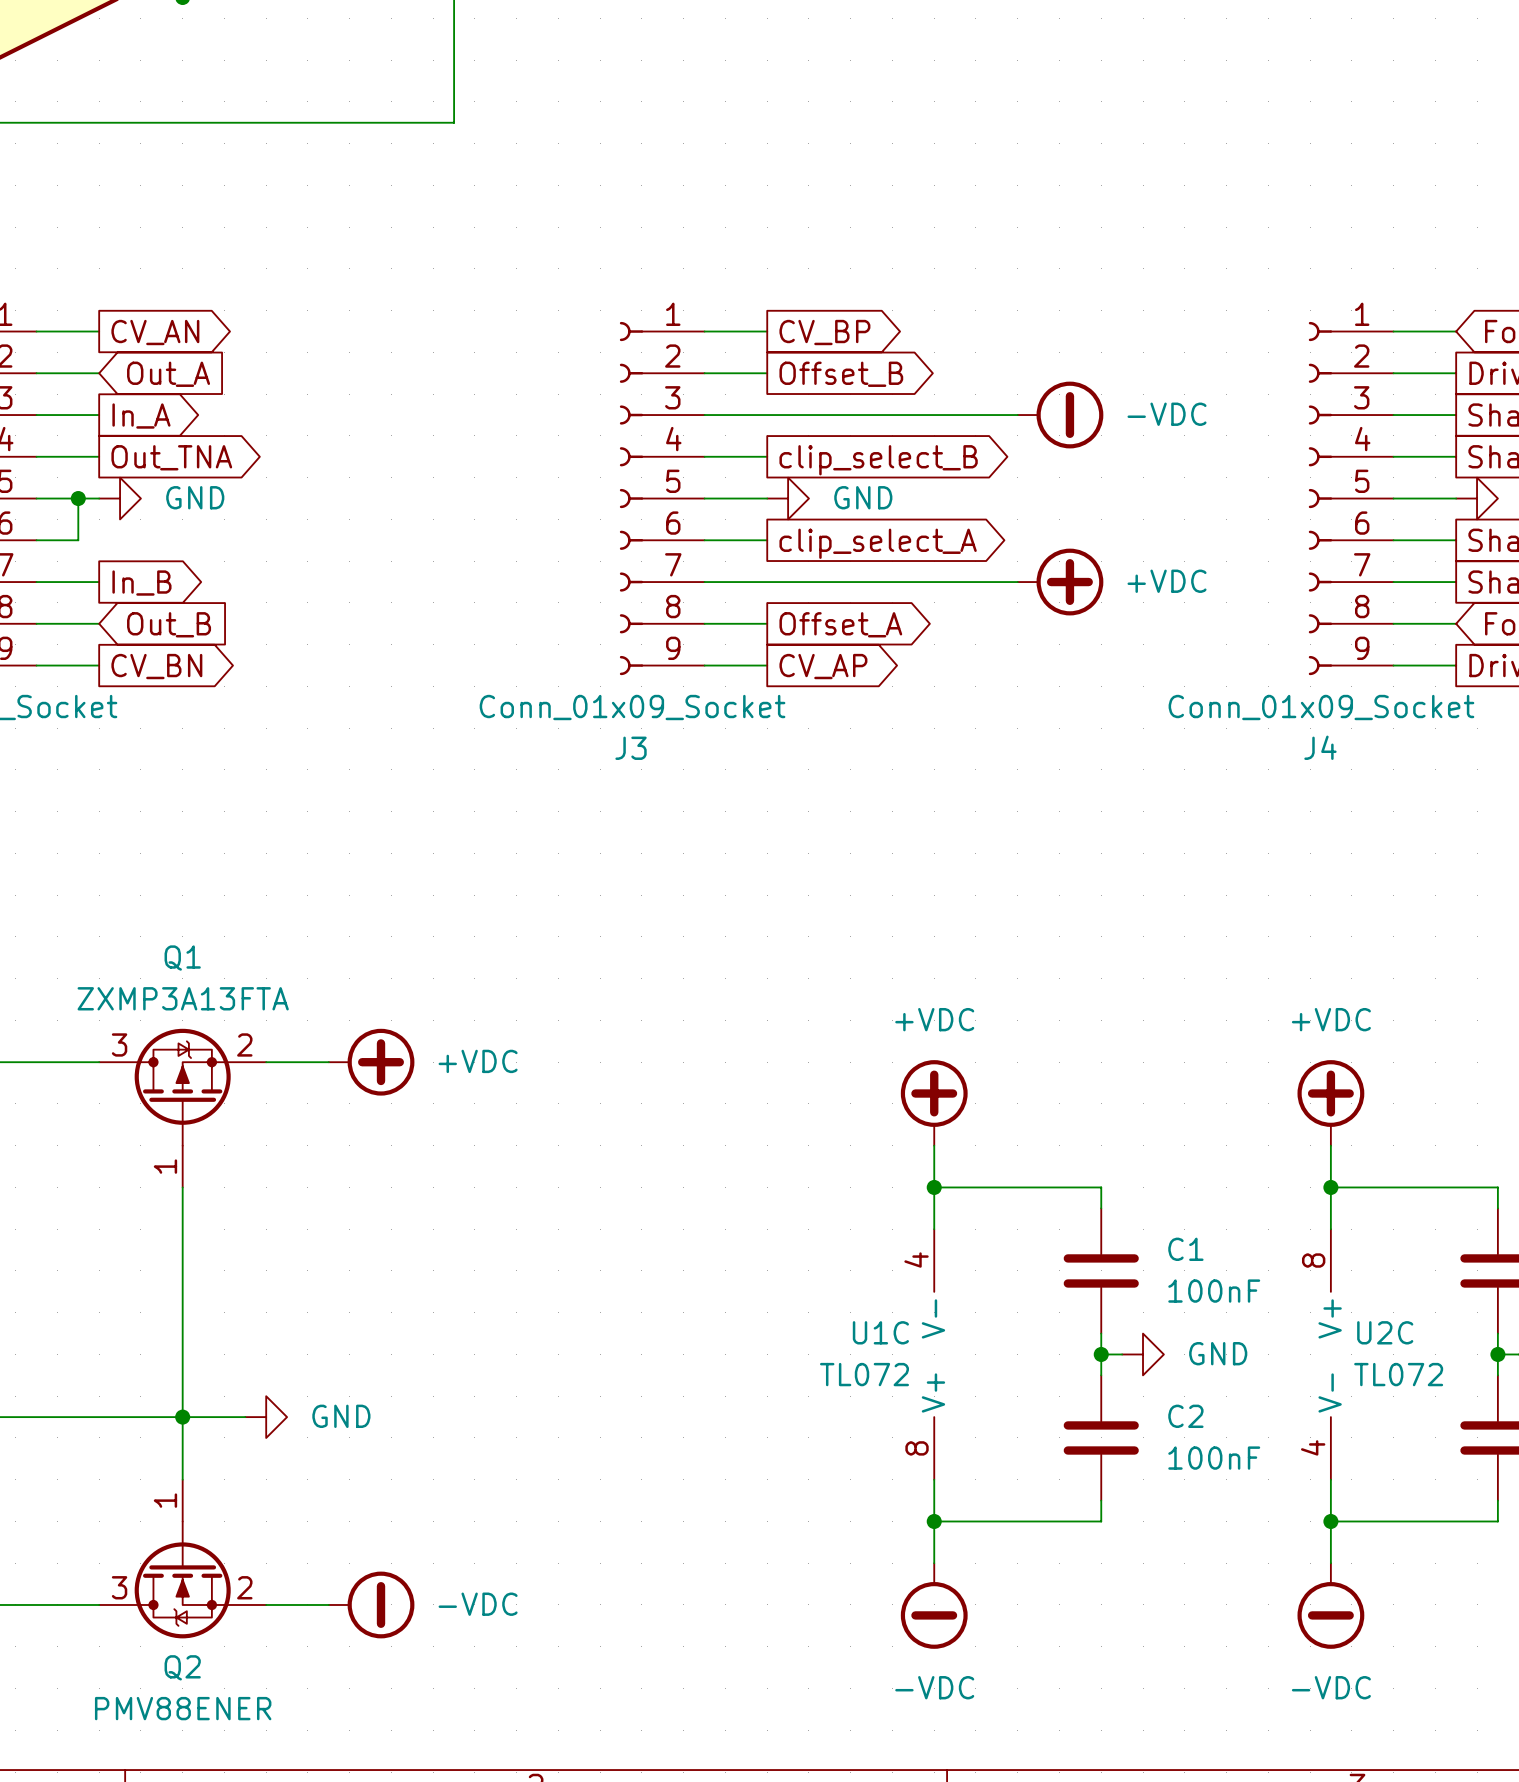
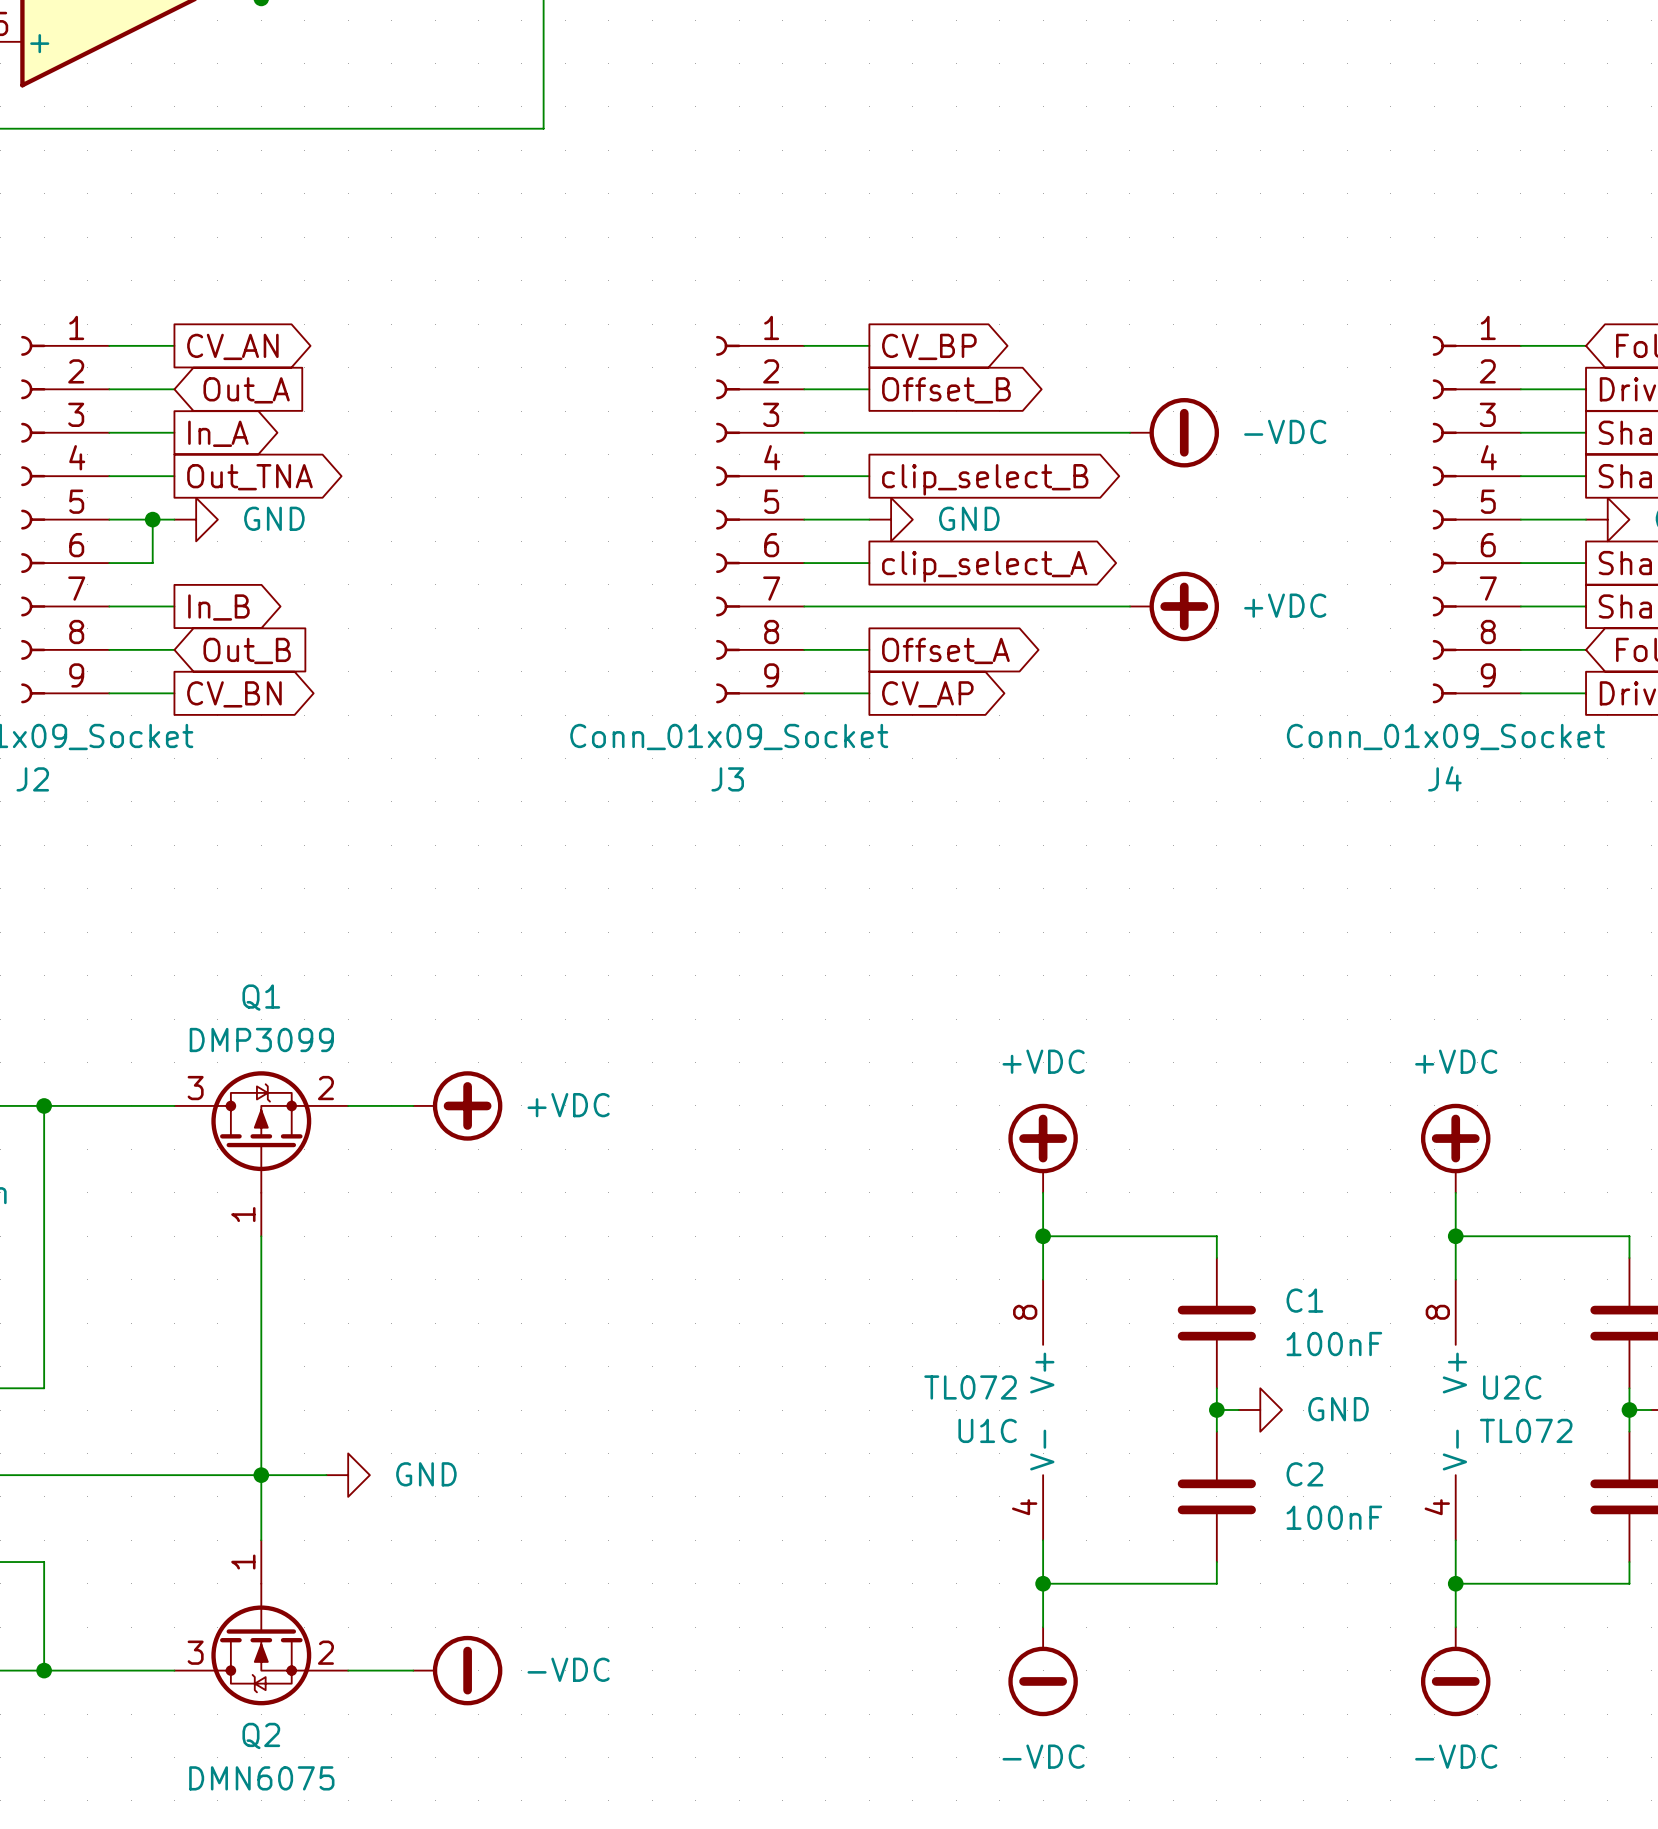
Q1 value: ZXMP3A13FTA (183, 998) -> DMP3099 (261, 1040)
U1C name position: U1C (880, 1332) -> U1C (987, 1430)
U1C rotation: 0° (934, 1354) -> 180° (1043, 1410)
U1C value position: TL072 (864, 1374) -> TL072 (970, 1387)
Q2 value: PMV88ENER (183, 1708) -> DMN6075 (261, 1778)

